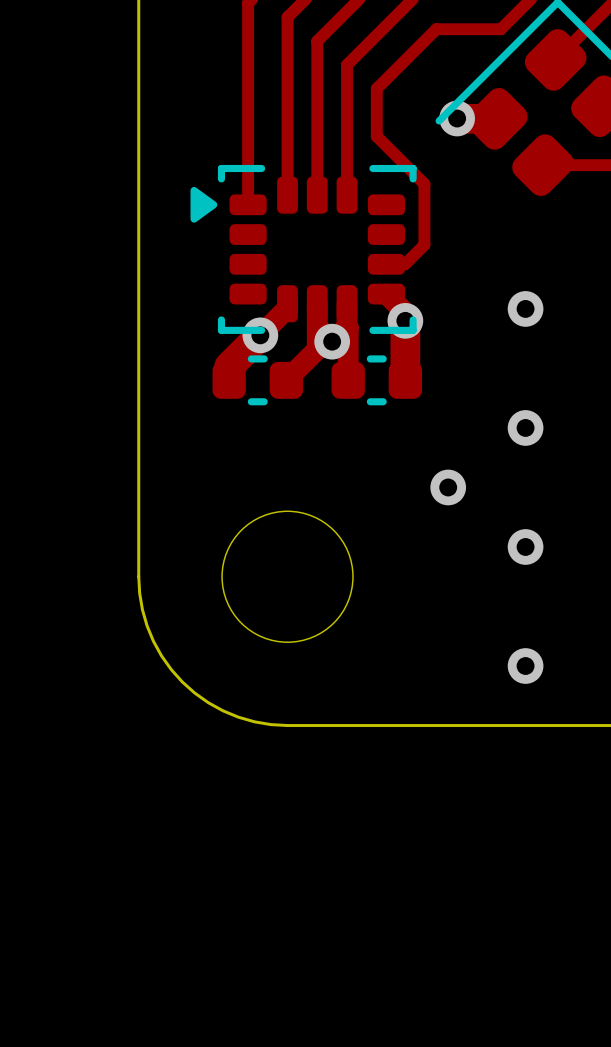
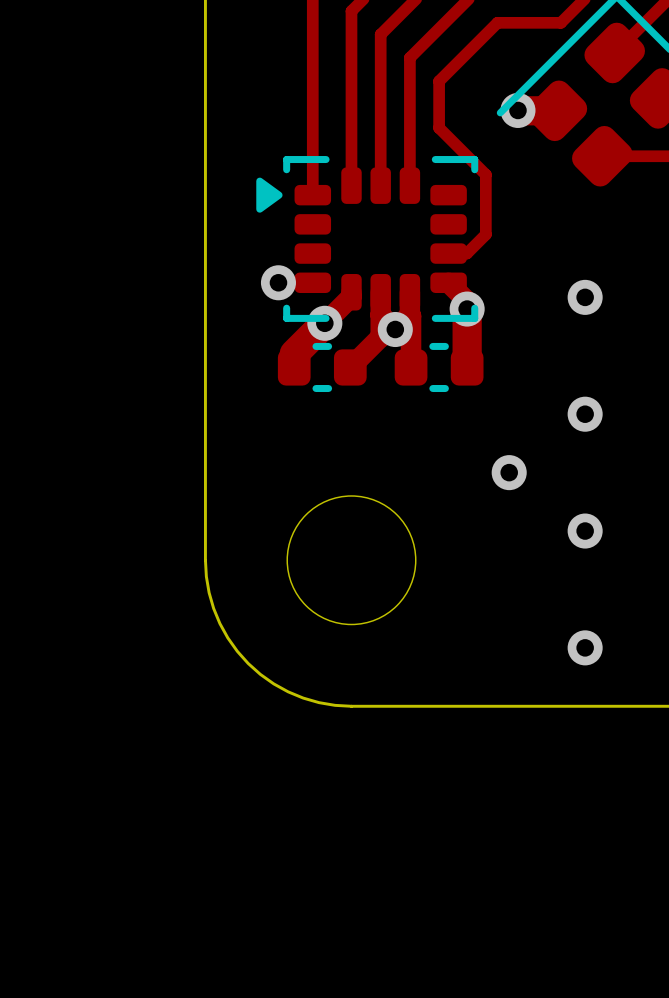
via: none -> (278, 282)

